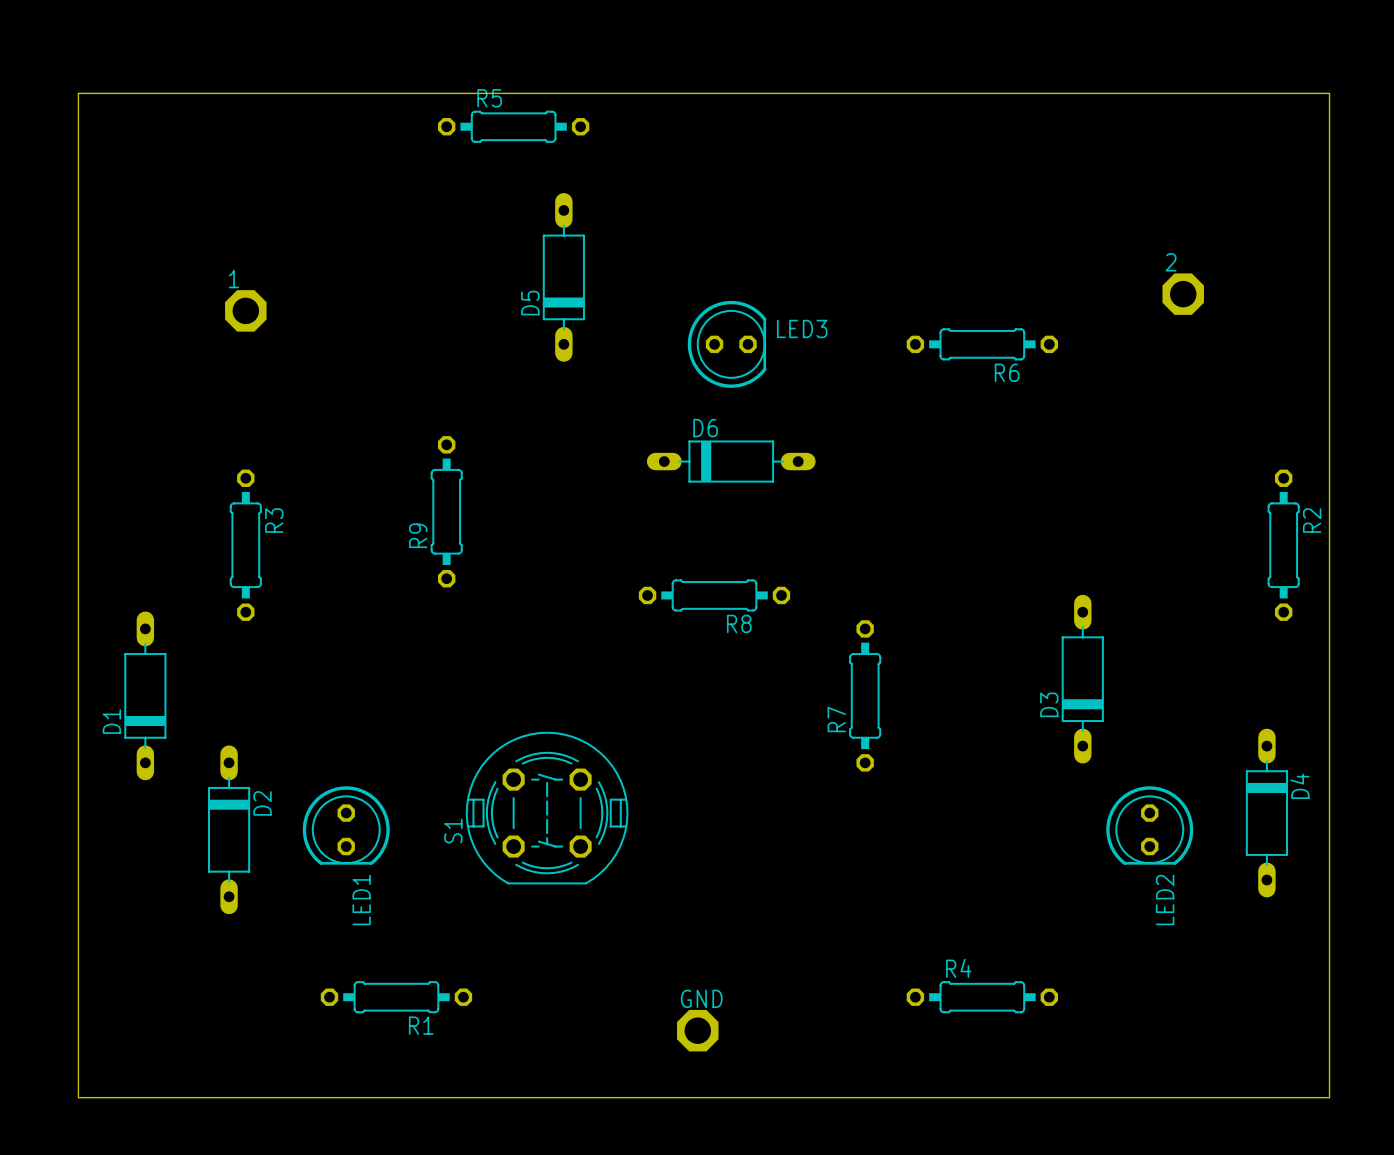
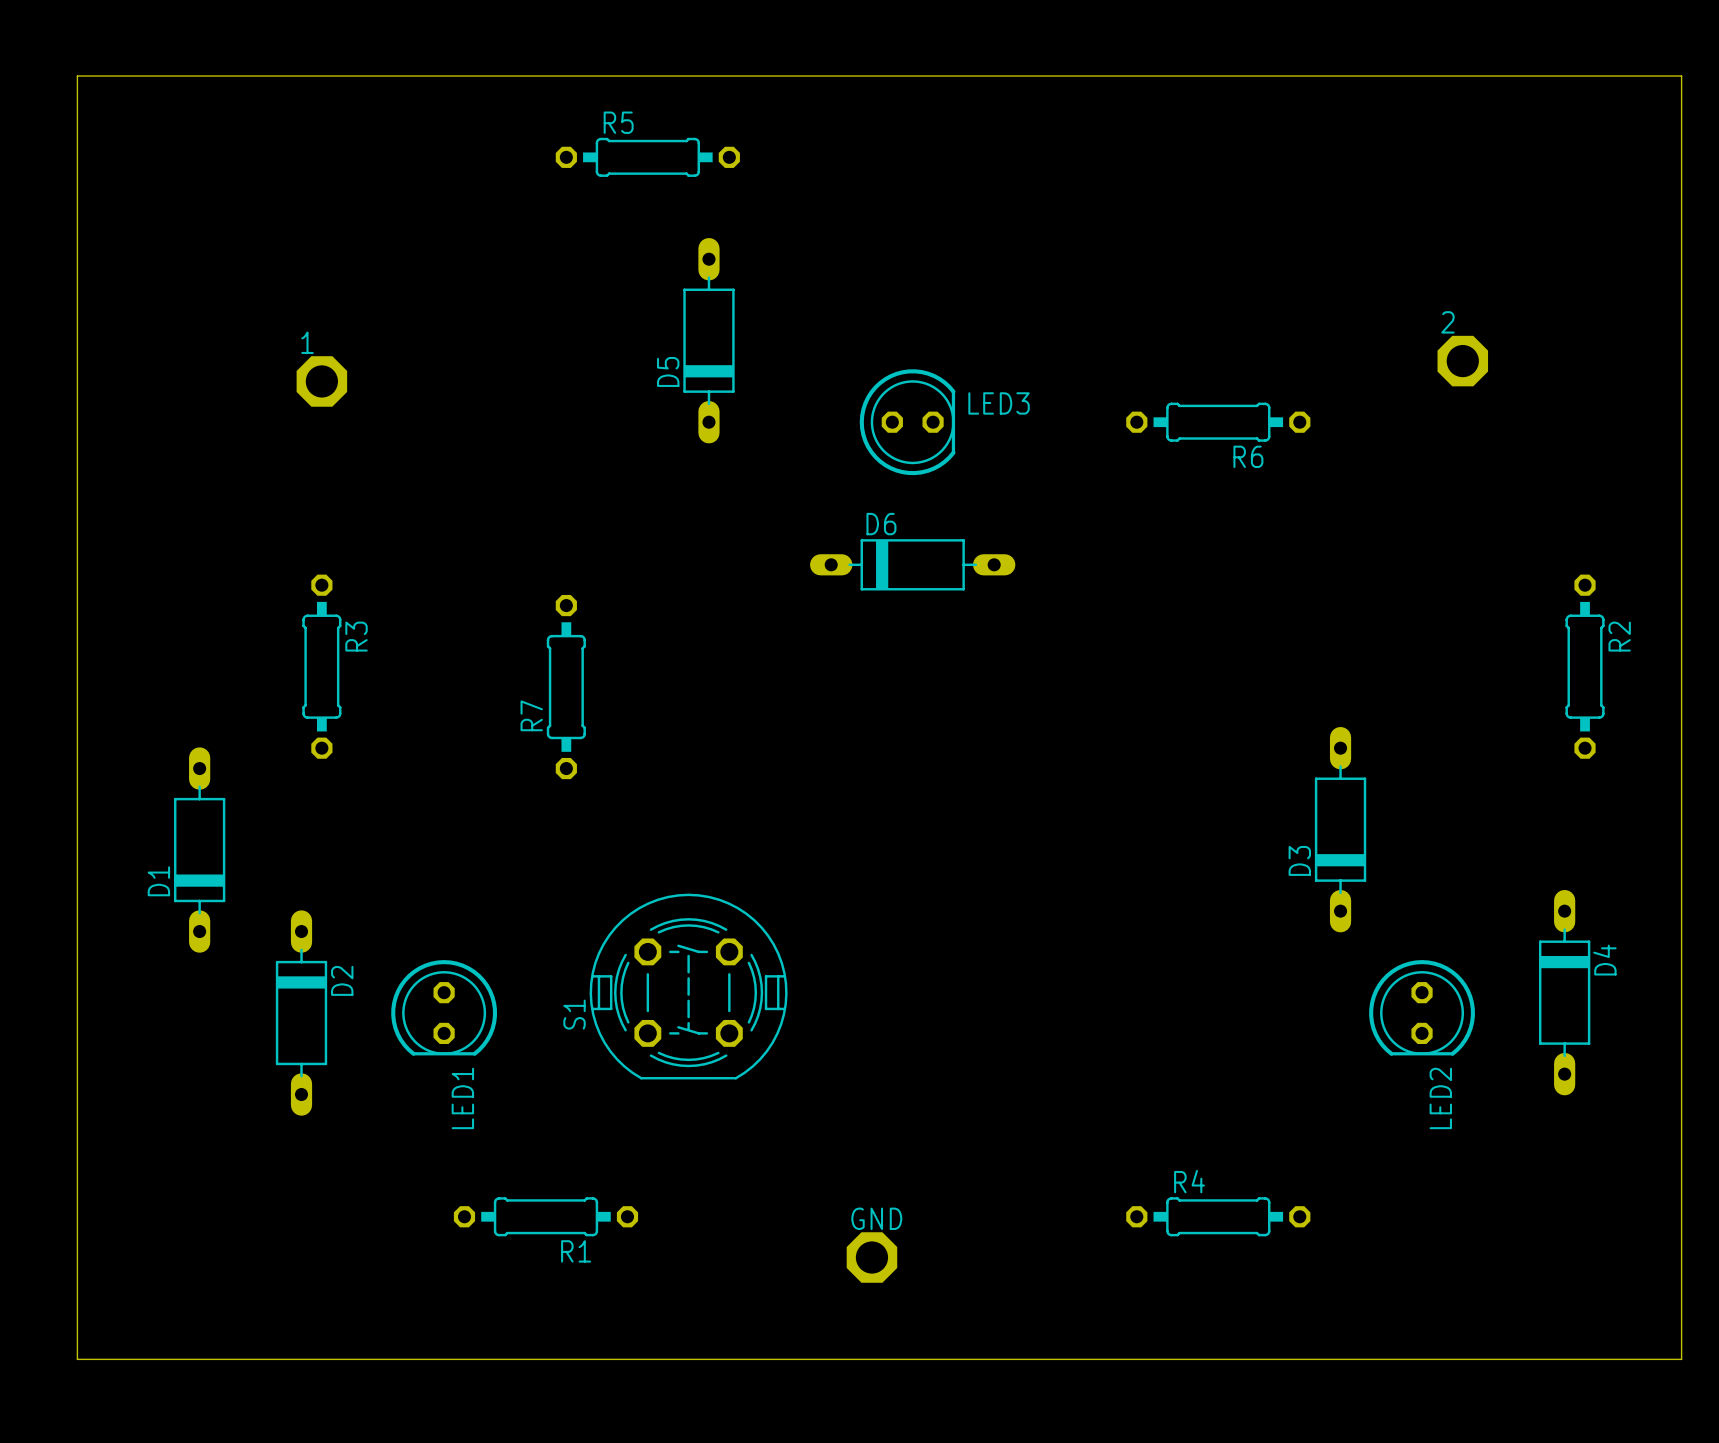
board edge: (78, 93) (1329, 93) (1329, 1097) (78, 1097) (78, 93) -> (77, 76) (77, 1359) (1681, 1359) (1681, 76) (77, 76)
R9: (446, 511) -> none
R8: (714, 595) -> none
R7 position: (865, 695) -> (566, 687)
R1 position: (396, 997) -> (545, 1216)

